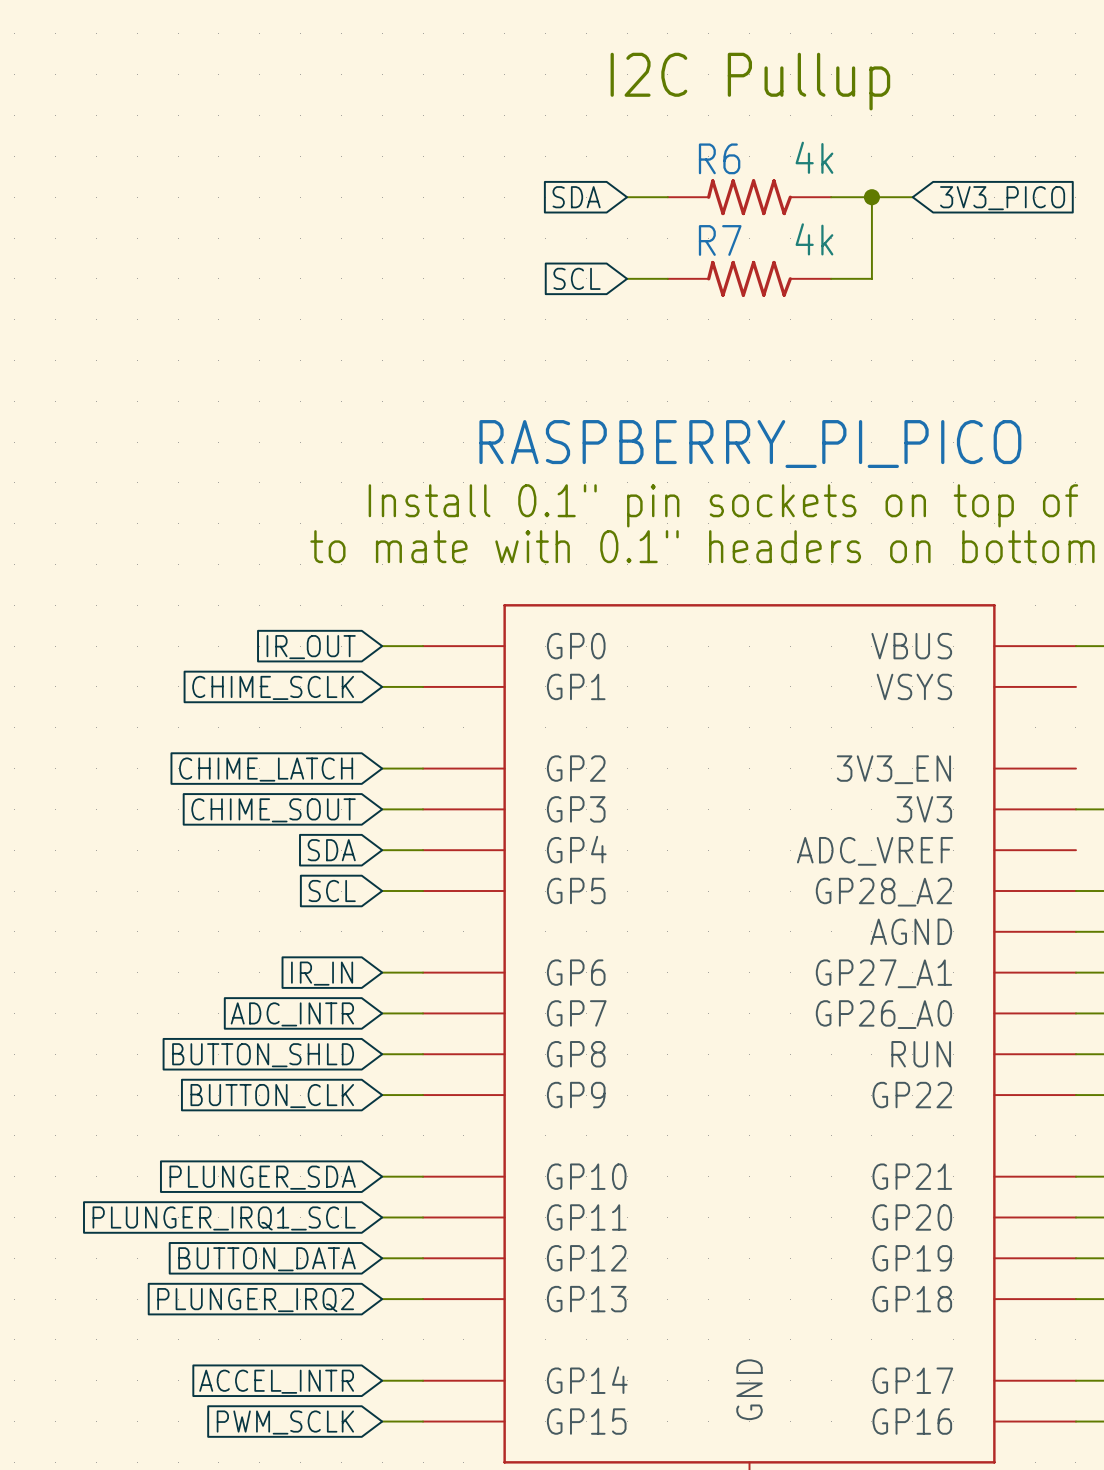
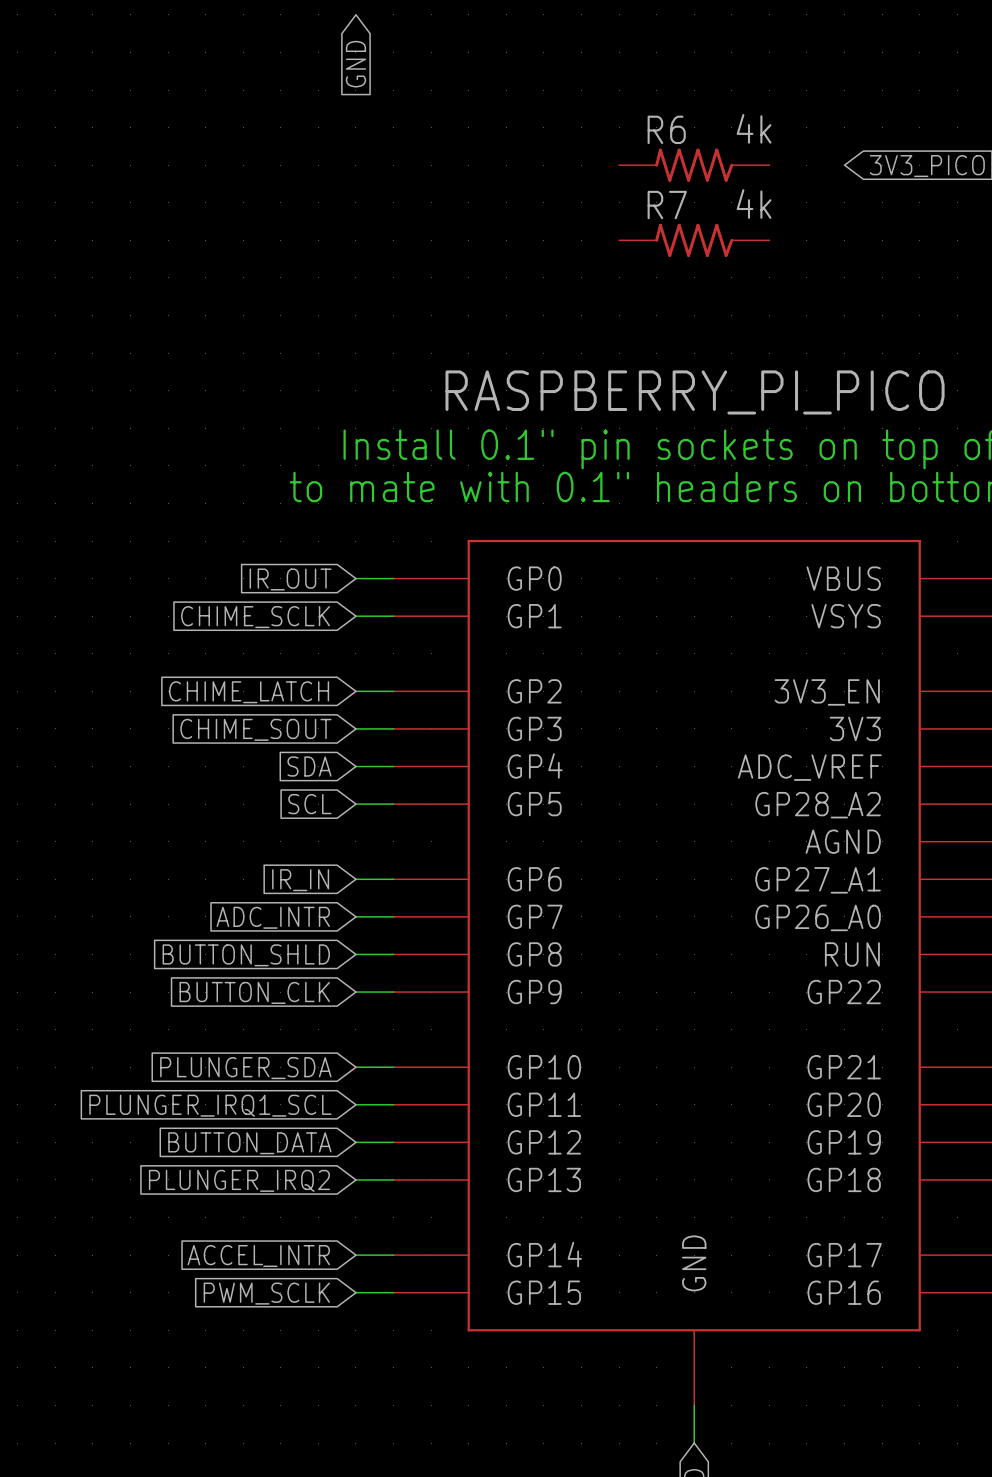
text: I2C Pullup (750, 81) -> none
global label: none -> GND (355, 64)
global label: SDA (576, 197) -> none
wire: (627, 197) (667, 197) -> none
wire: (831, 197) (912, 197) -> none
wire: (871, 197) (871, 278) (831, 278) -> none
junction: (871, 197) -> none
global label: SCL (577, 278) -> none
wire: (627, 278) (667, 278) -> none

